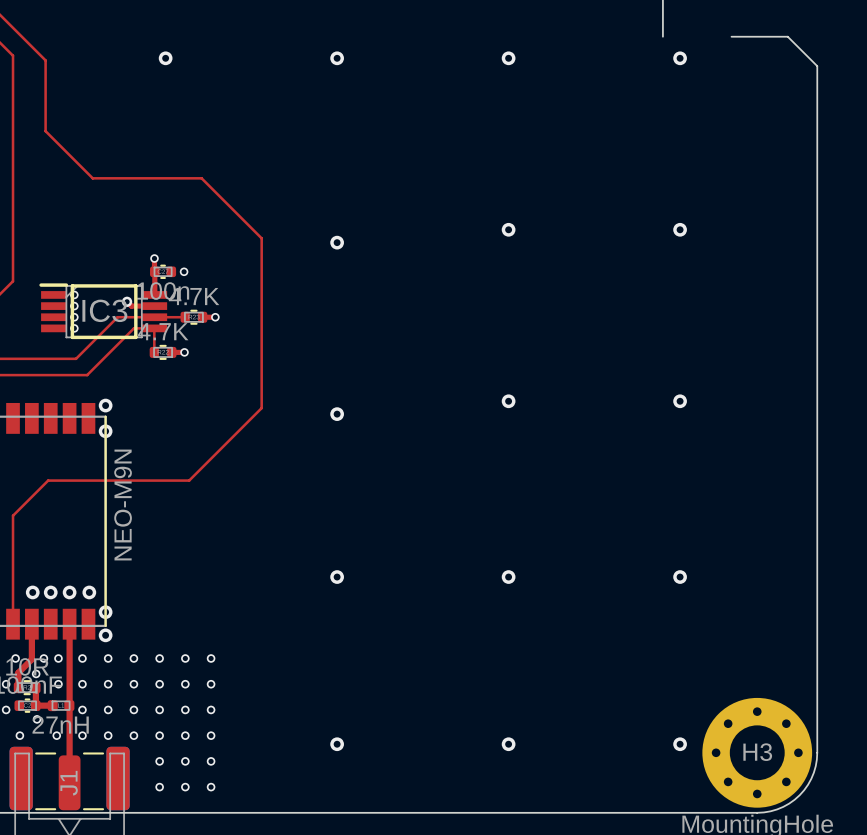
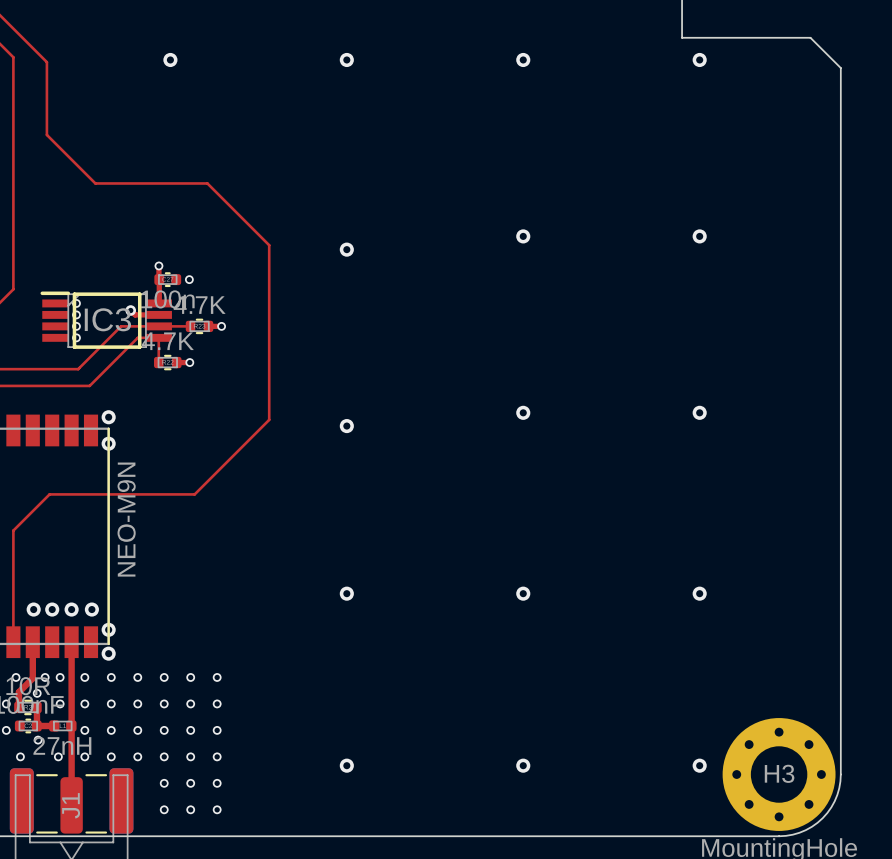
board edge: none -> (682, 37) (752, 37)

